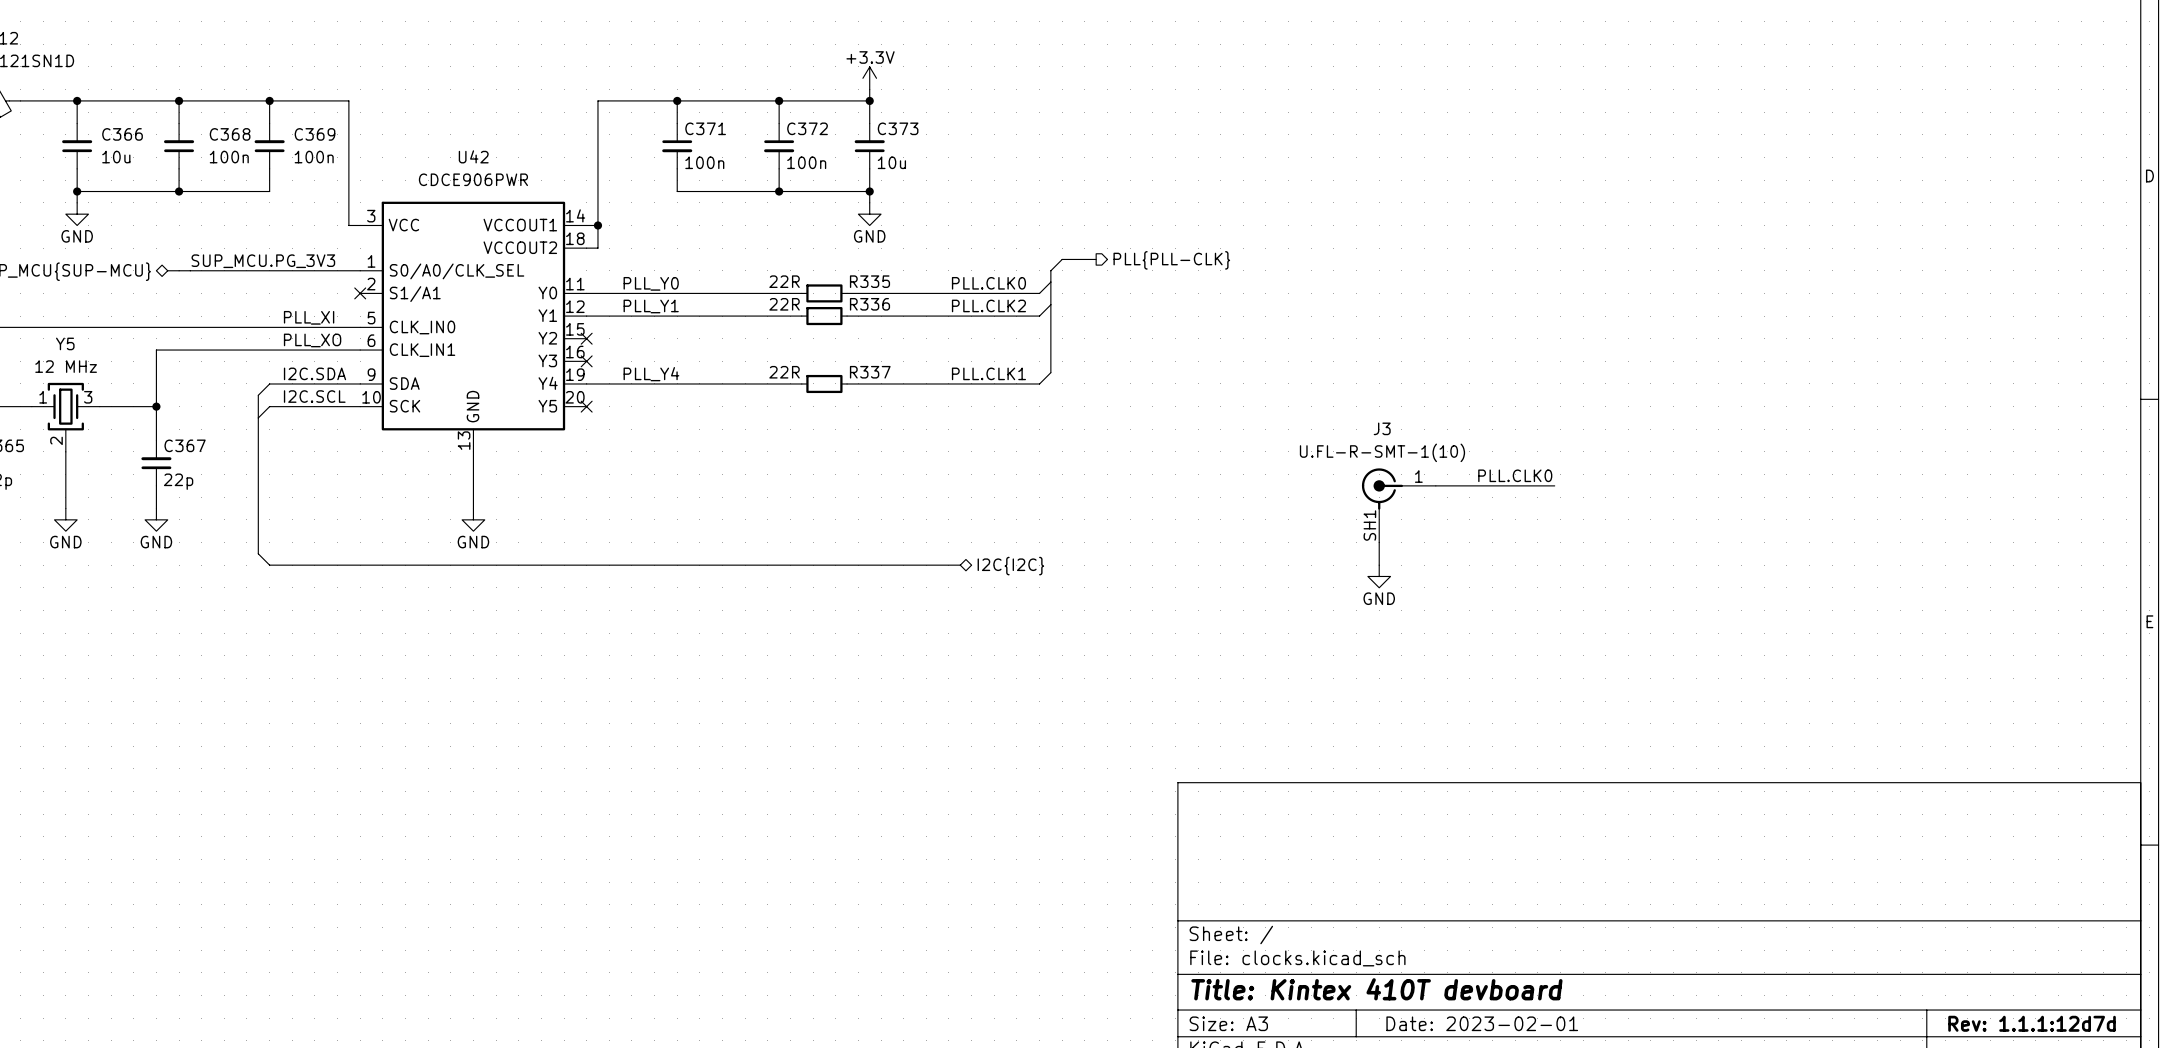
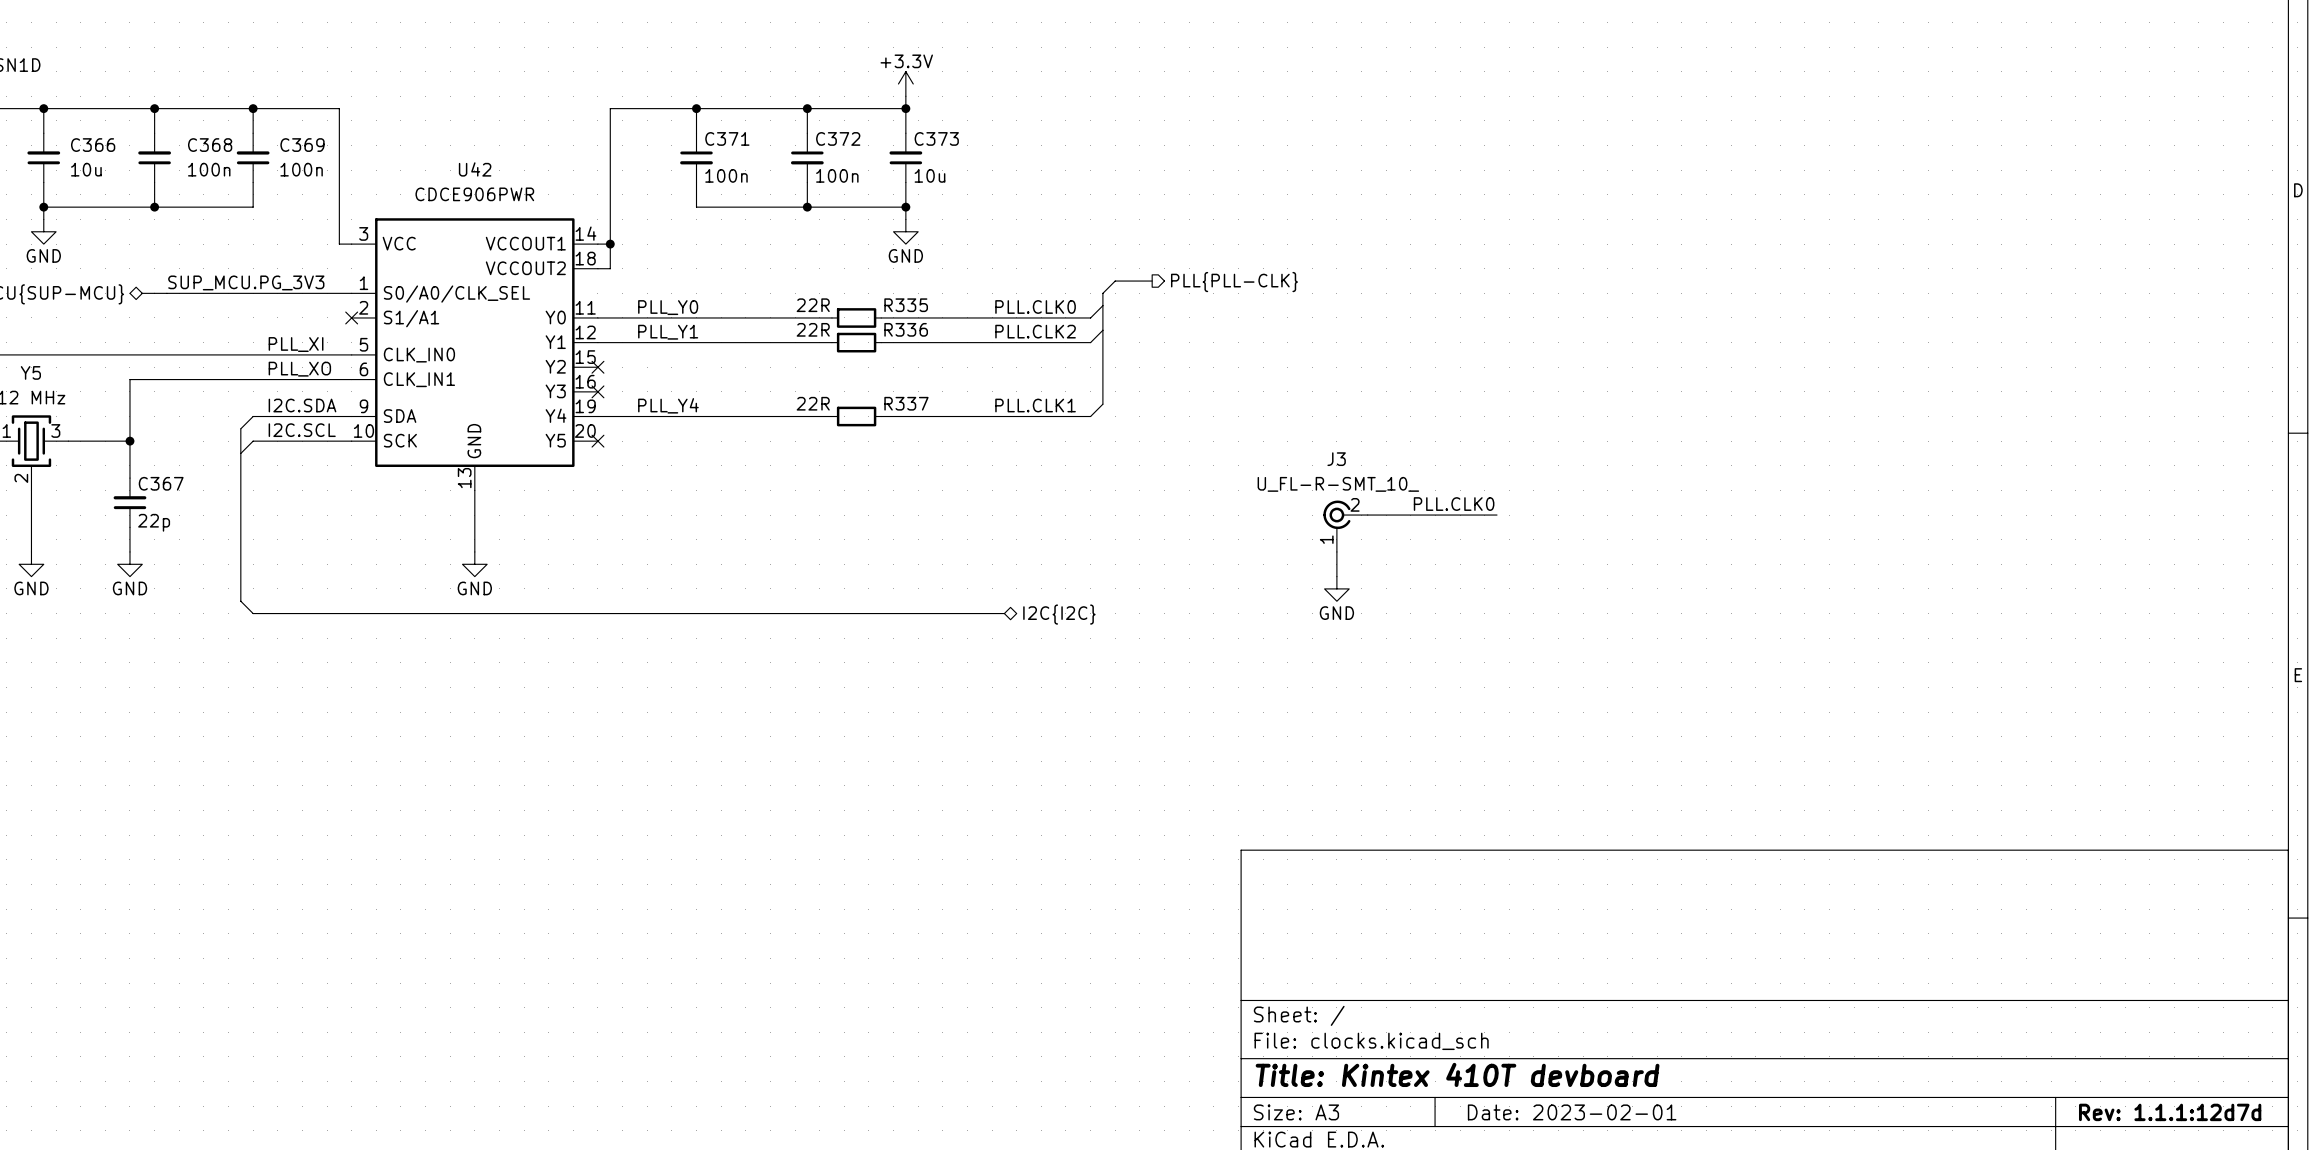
J3 value: none -> U_FL-R-SMT_10_ (1338, 484)
J3 text: U.FL-R-SMT-1(10) (1382, 452) -> none
J3 symbol: [1361, 468, 1436, 543] -> [1323, 500, 1368, 552]
label position: PLL.CLK0 (1515, 475) -> PLL.CLK0 (1454, 504)
wire: (1435, 485) (1554, 485) -> (1367, 515) (1497, 515)
wire: (1379, 542) (1379, 565) -> (1336, 551) (1336, 576)
power symbol position: GND (1379, 576) -> GND (1336, 588)

